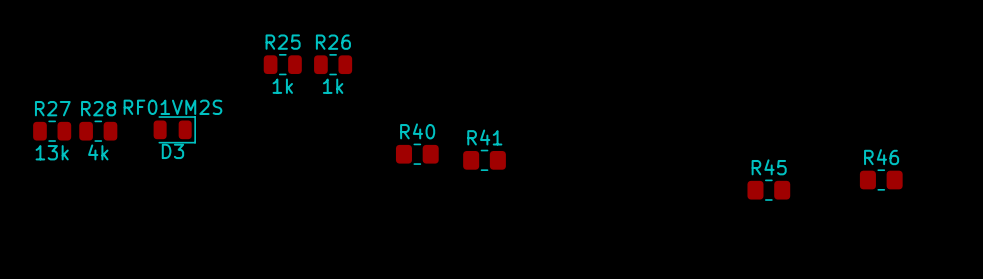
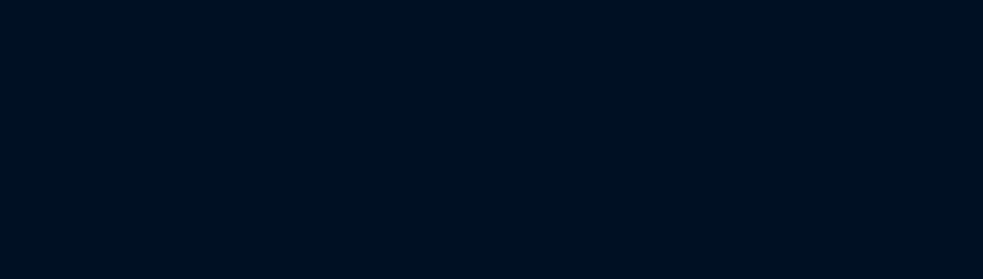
R25: 1k (282, 64) -> none
R26: 1k (333, 64) -> none
D3: RF01VM2S (174, 129) -> none
R27: 13k (52, 131) -> none
R28: 4k (98, 131) -> none
R40: (417, 154) -> none
R41: (484, 160) -> none
R46: (881, 180) -> none
R45: (768, 190) -> none

